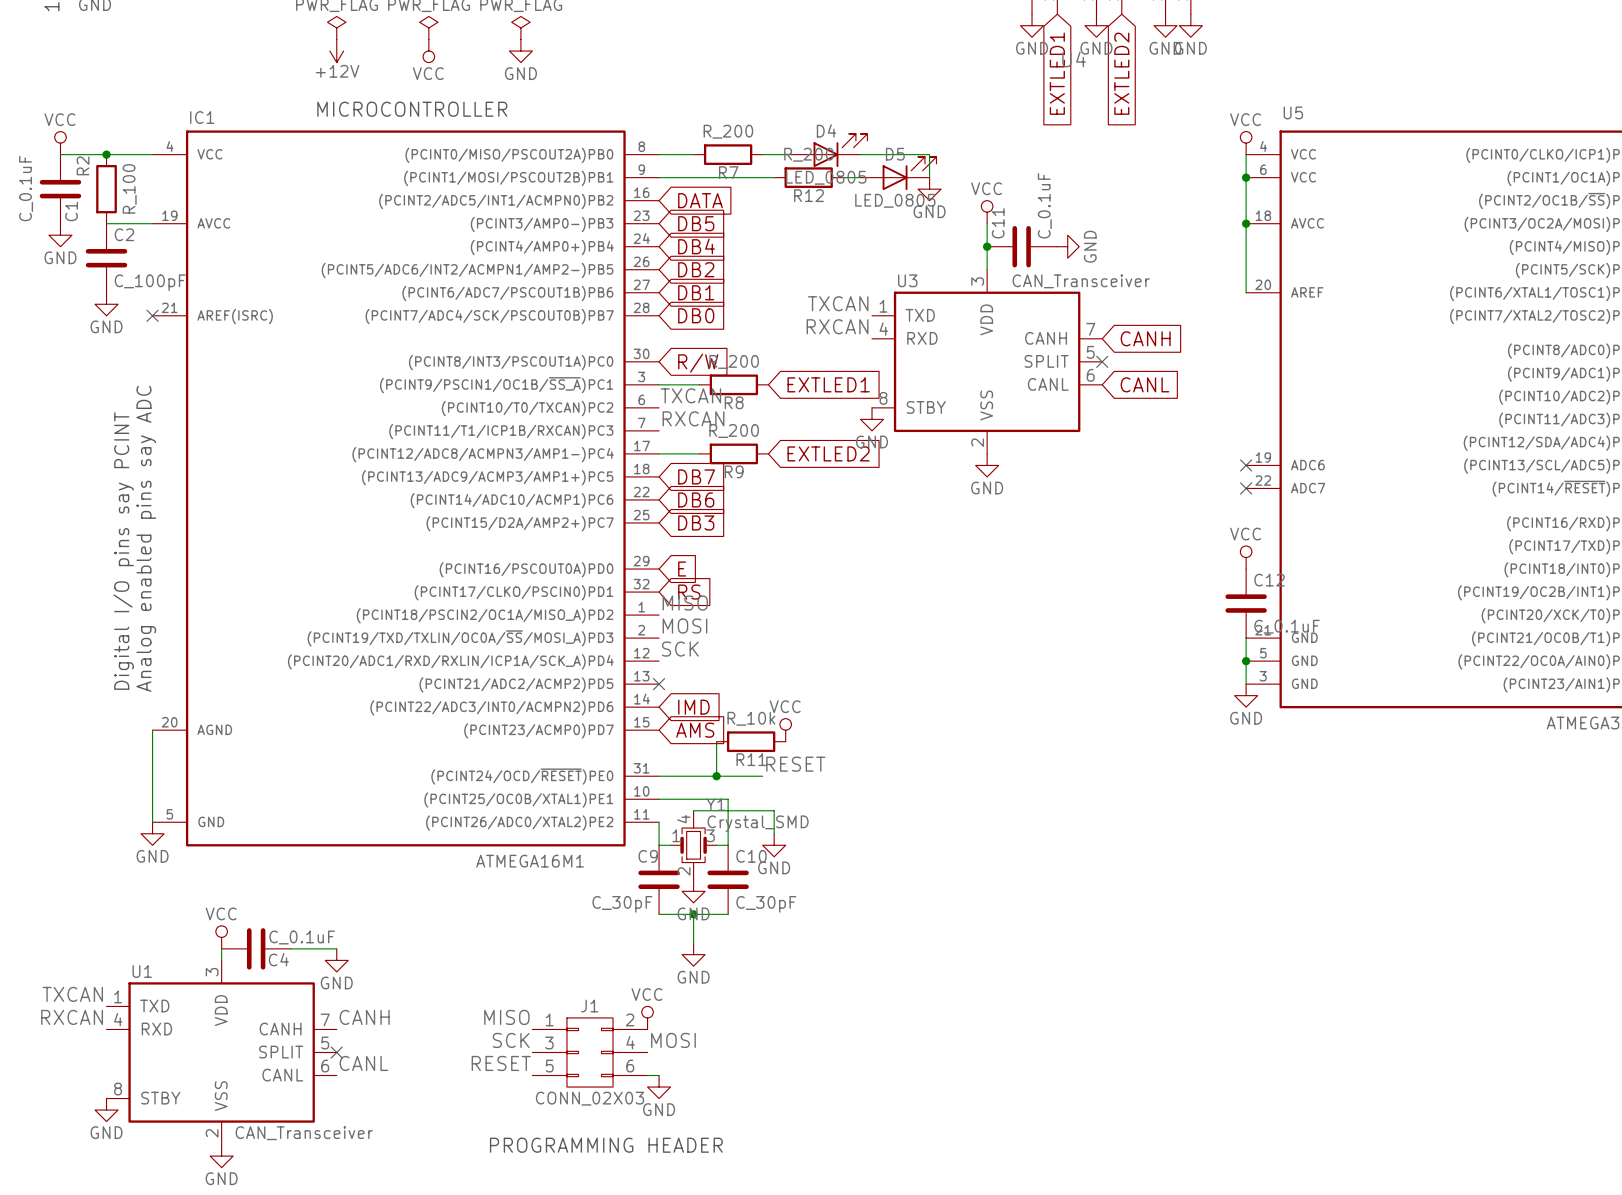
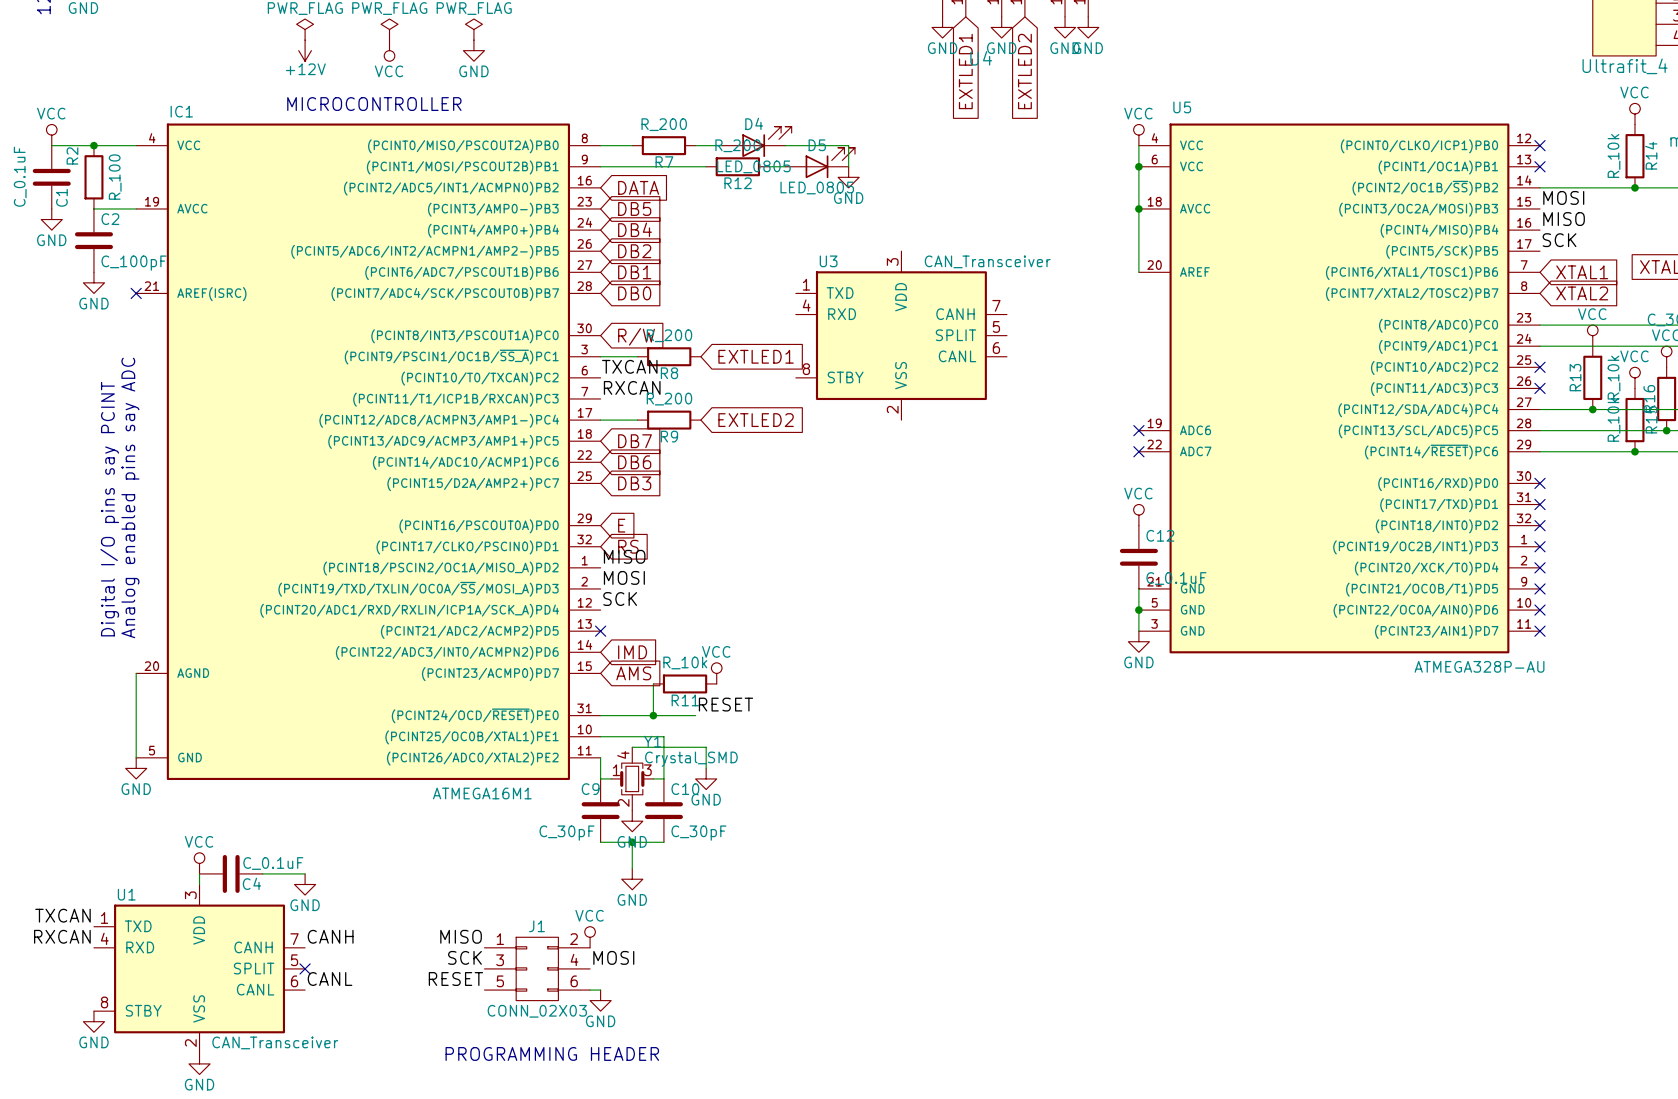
power symbol: VCC (987, 212) -> none
wire: (987, 223) (987, 269) -> none
junction: (987, 246) -> none
C11: C_0.1uF (1021, 246) -> none
power symbol: GND (1067, 246) -> none
label: TXCAN (838, 303) -> none
label: RXCAN (837, 326) -> none
global label: CANH (1145, 338) -> none
no-connect mark: (1102, 361) -> none
global label: CANL (1144, 384) -> none
power symbol: GND (872, 419) -> none
power symbol: GND (987, 465) -> none

